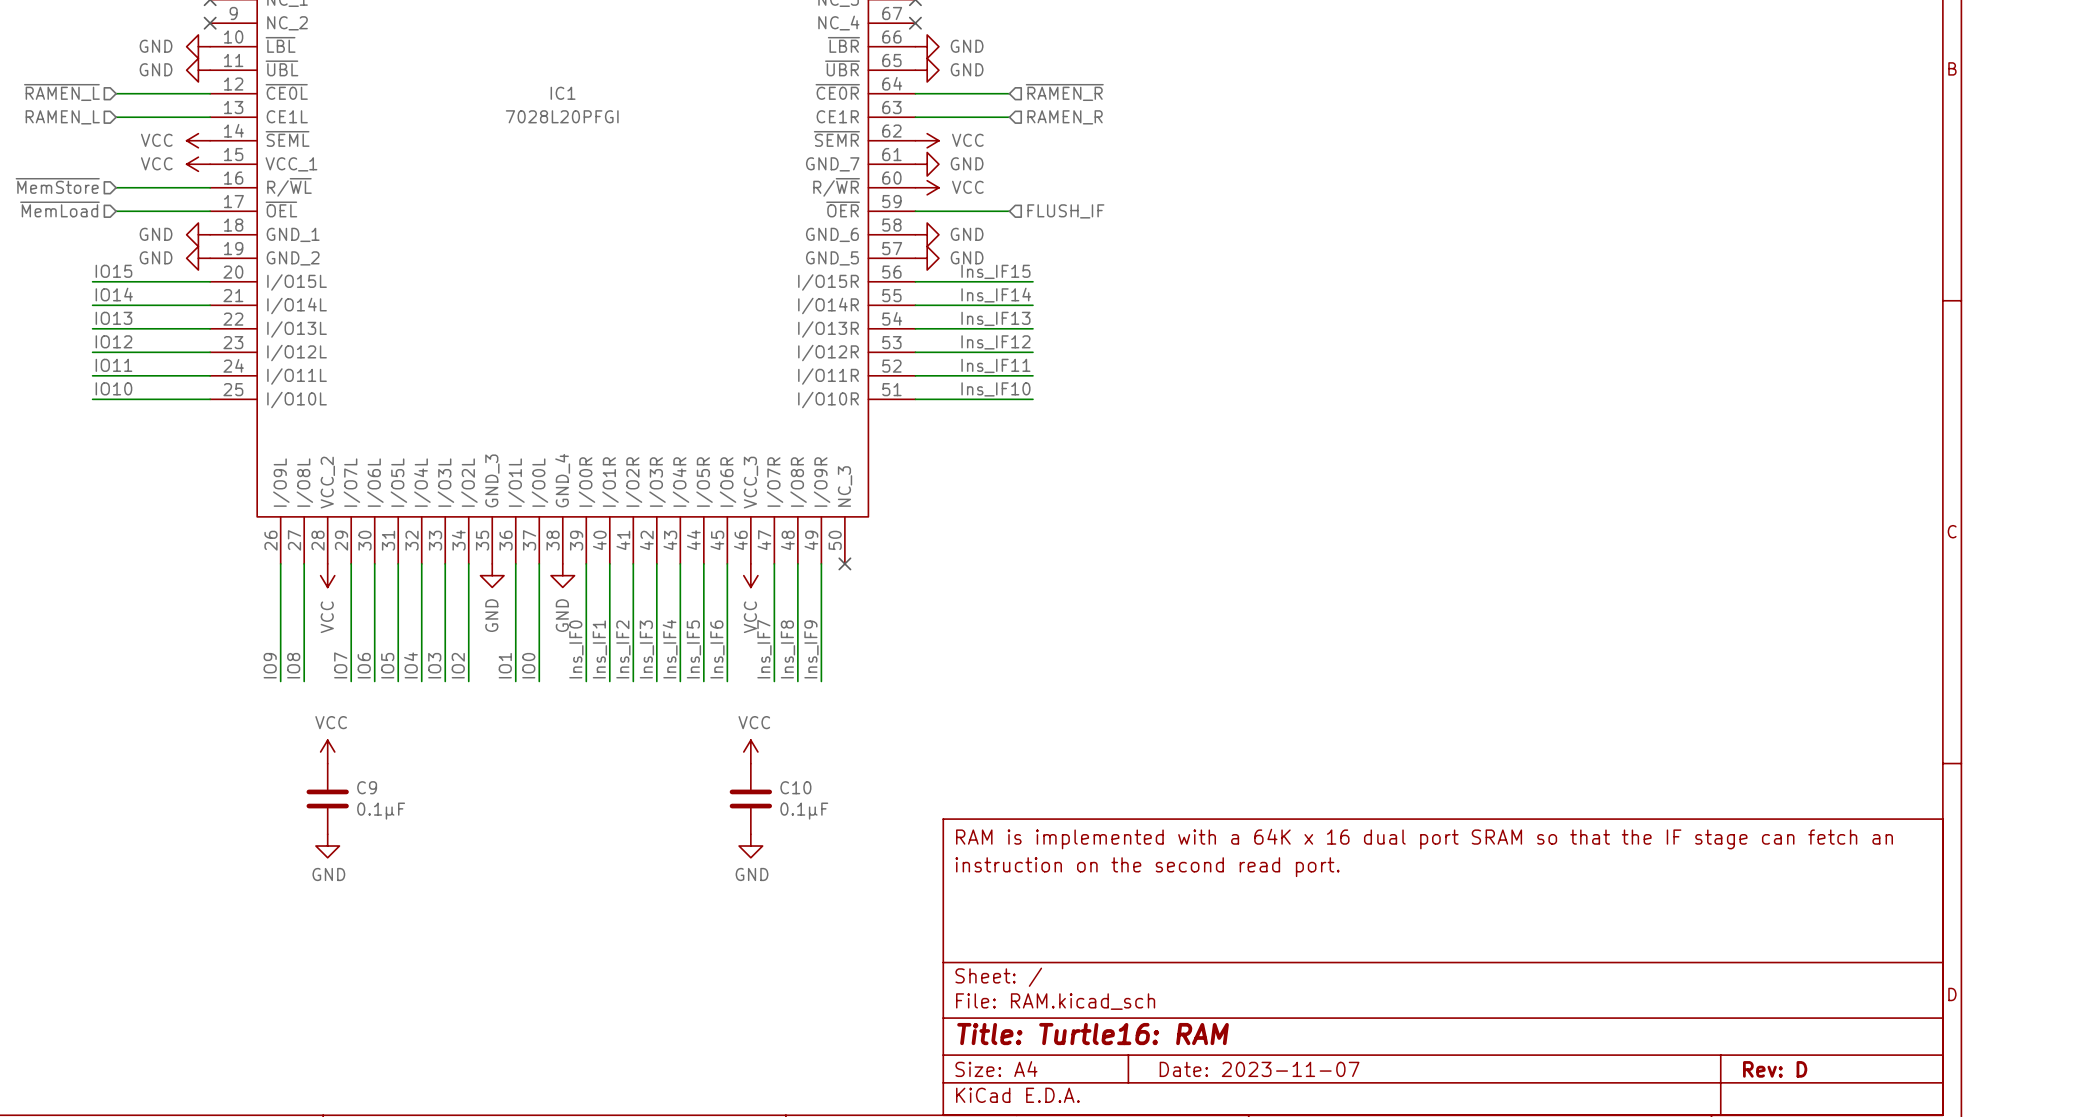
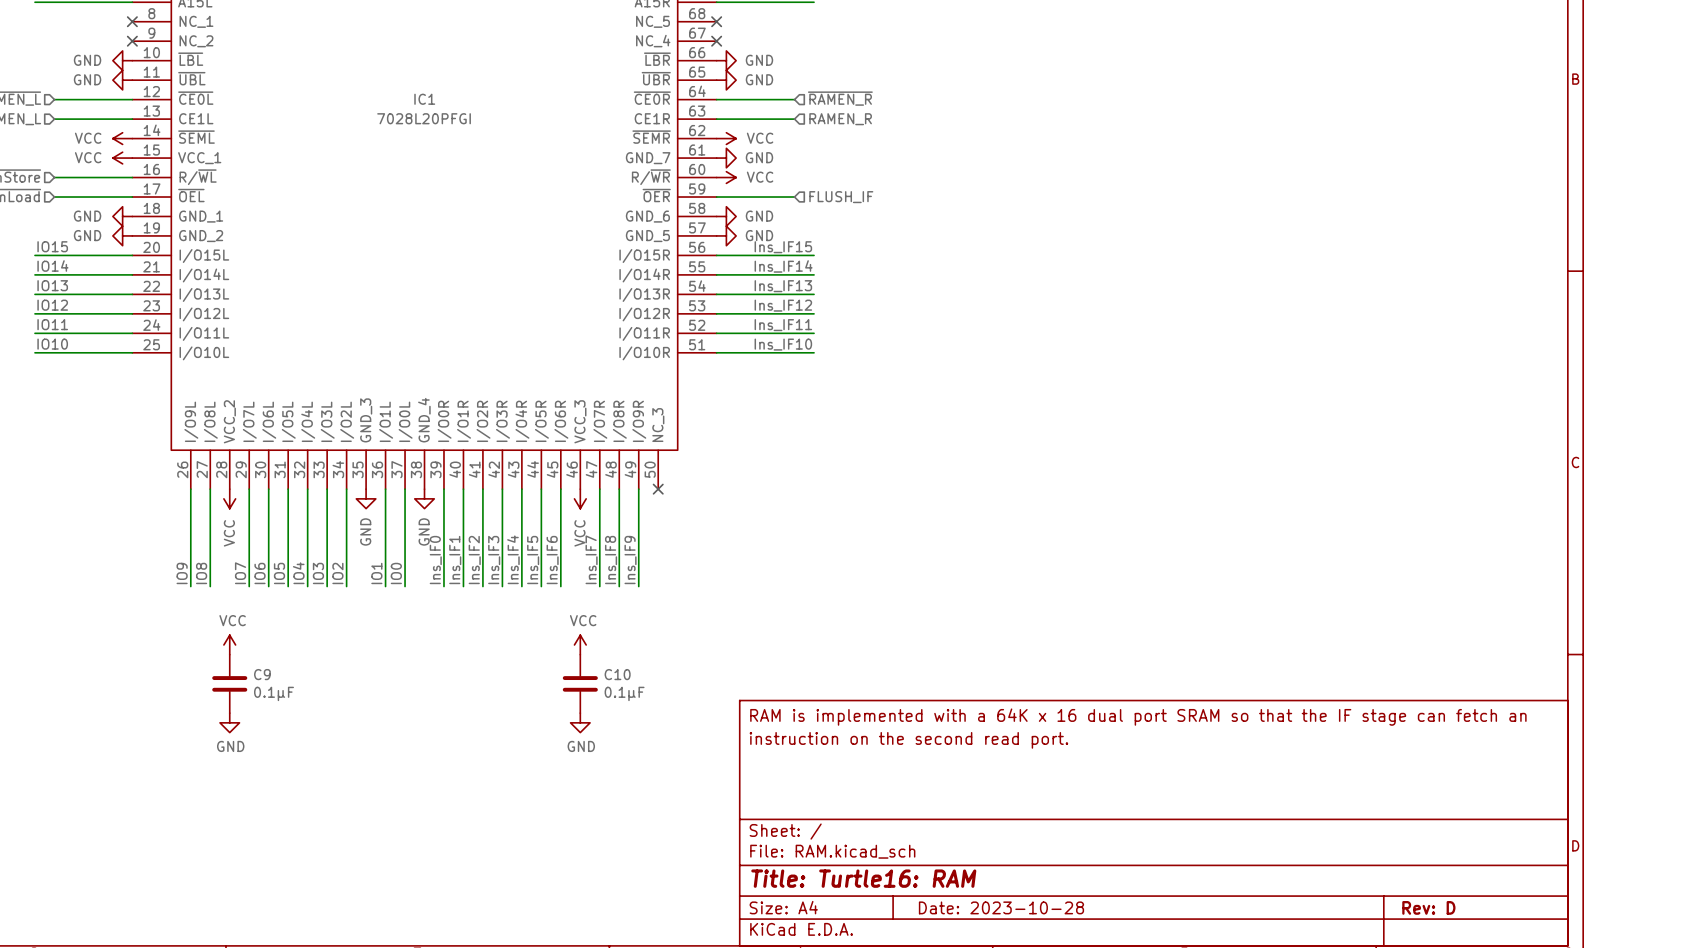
title block: Date: 2023-11-07 (1259, 1069) -> Date: 2023-10-28 (1001, 907)

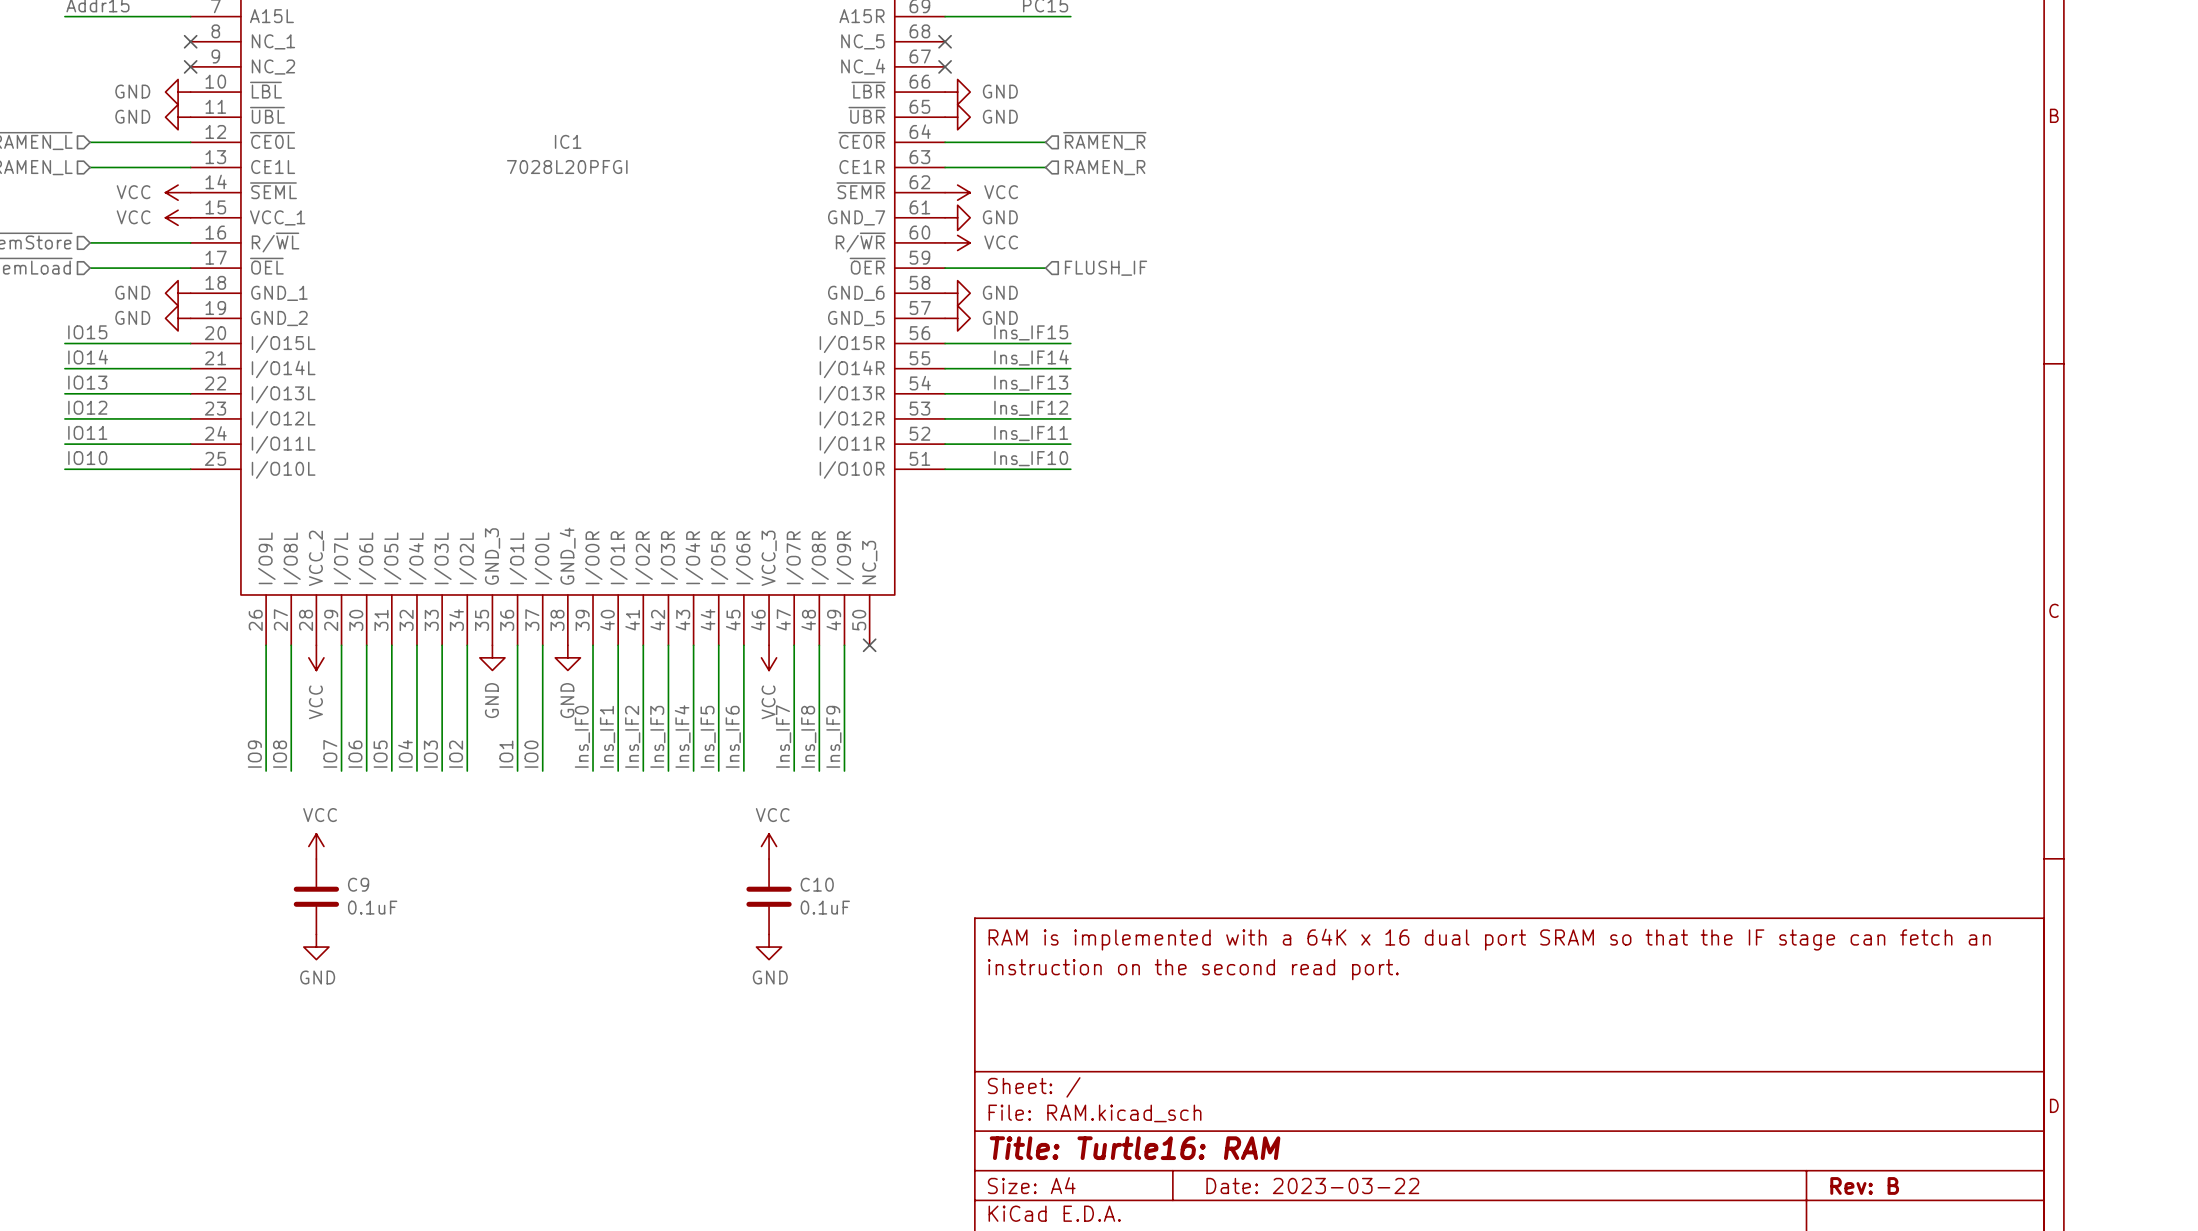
C9 value: 0.1μF (274, 693) -> 0.1uF (372, 907)
C10 value: 0.1μF (624, 693) -> 0.1uF (825, 907)
title block: Date: 2023-10-28 (1001, 907) -> Date: 2023-03-22 (1312, 1185)
title block: Rev: D (1428, 907) -> Rev: B (1864, 1185)

